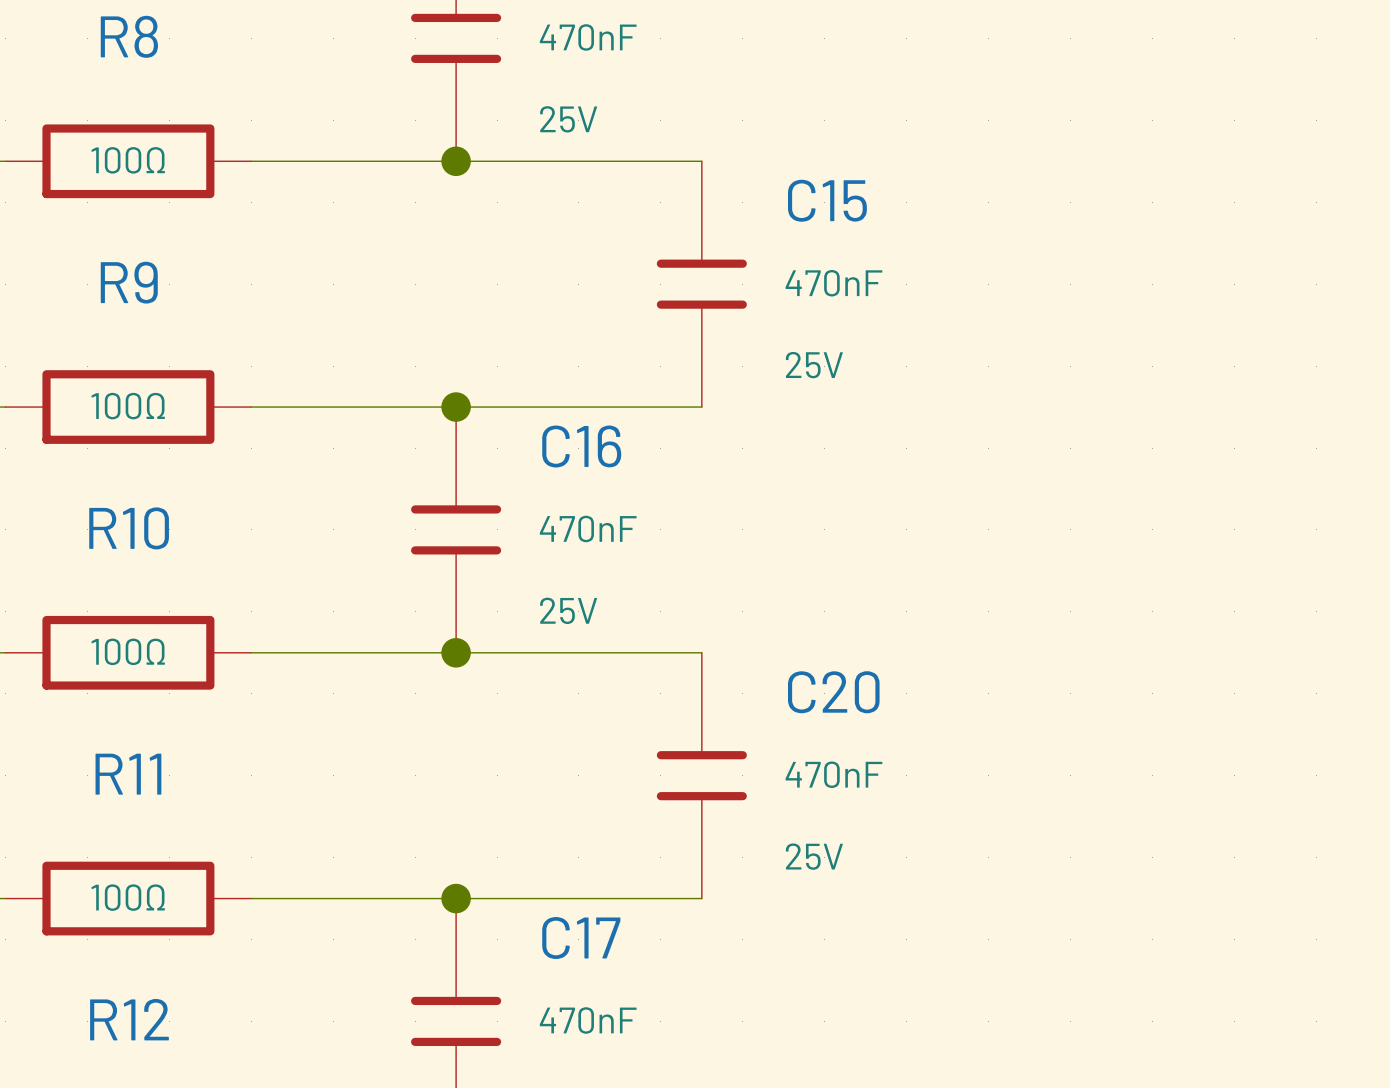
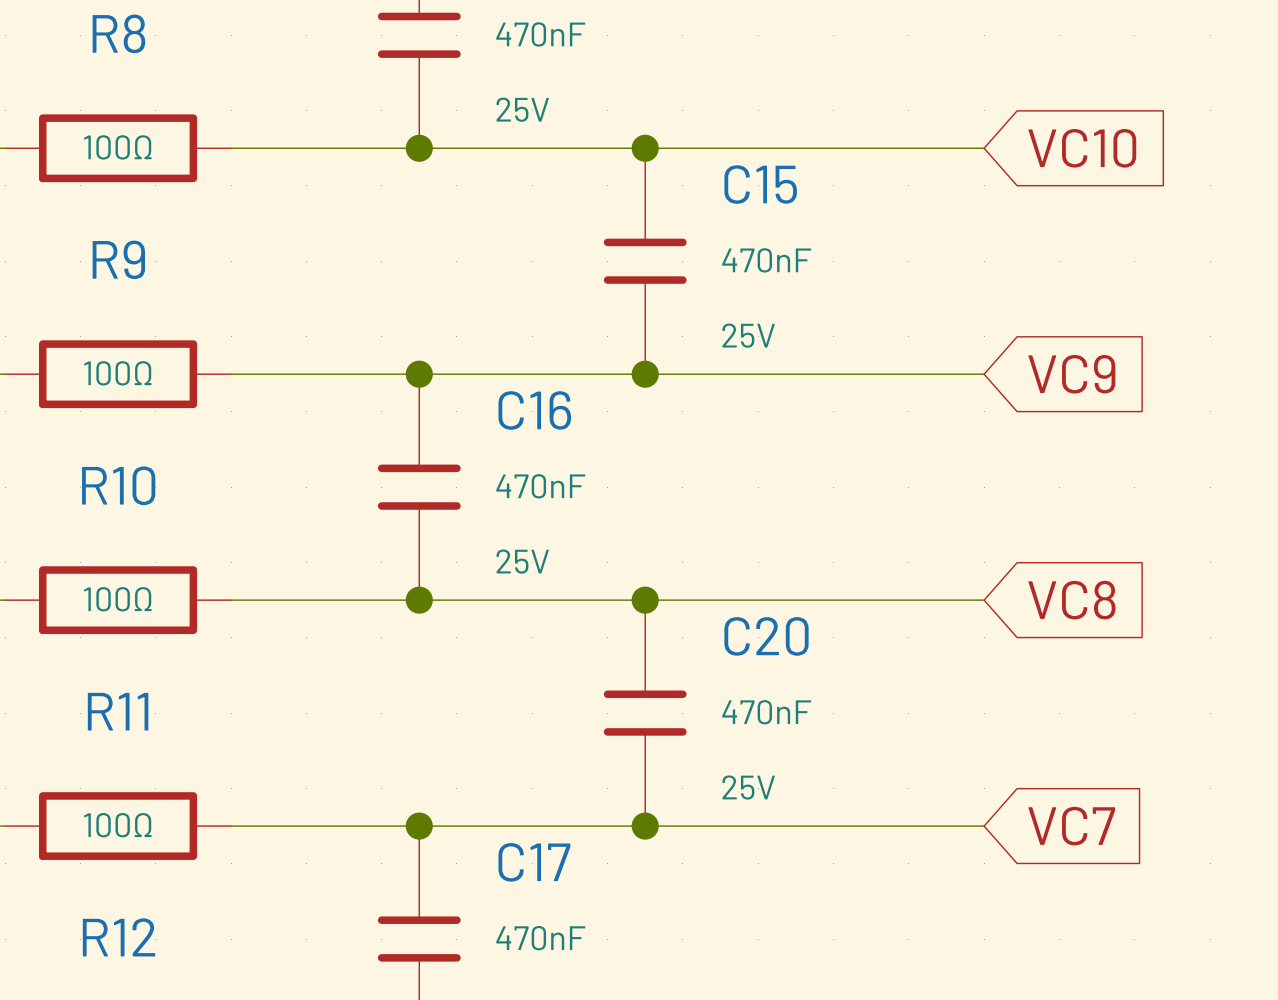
wire: none -> (645, 148) (984, 148)
junction: none -> (645, 148)
global label: none -> VC10 (1082, 148)
wire: none -> (645, 374) (984, 374)
junction: none -> (645, 374)
global label: none -> VC9 (1071, 374)
wire: none -> (645, 600) (984, 600)
junction: none -> (645, 600)
global label: none -> VC8 (1071, 600)
wire: none -> (645, 826) (984, 826)
junction: none -> (645, 826)
global label: none -> VC7 (1071, 826)

